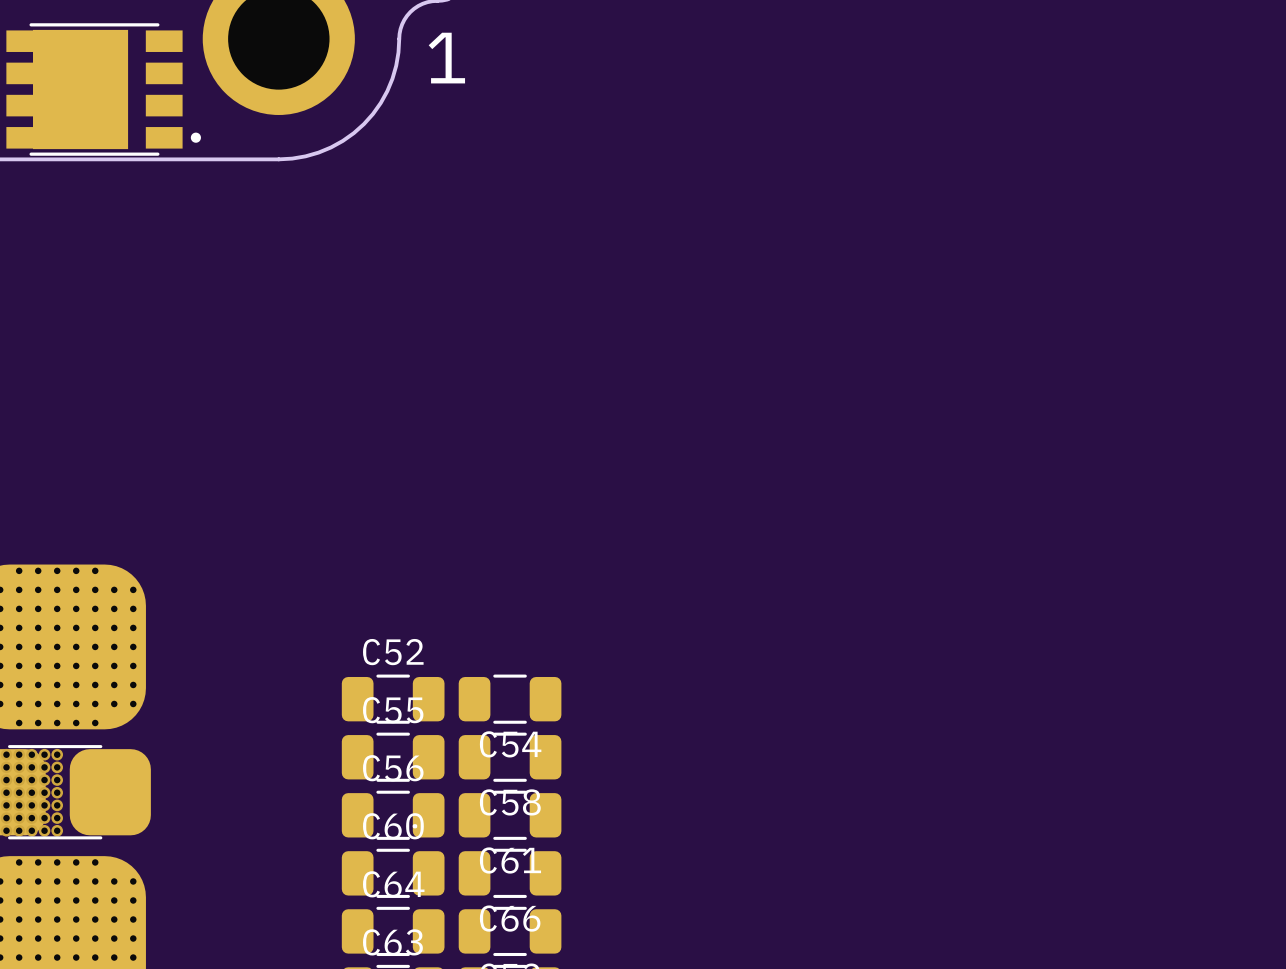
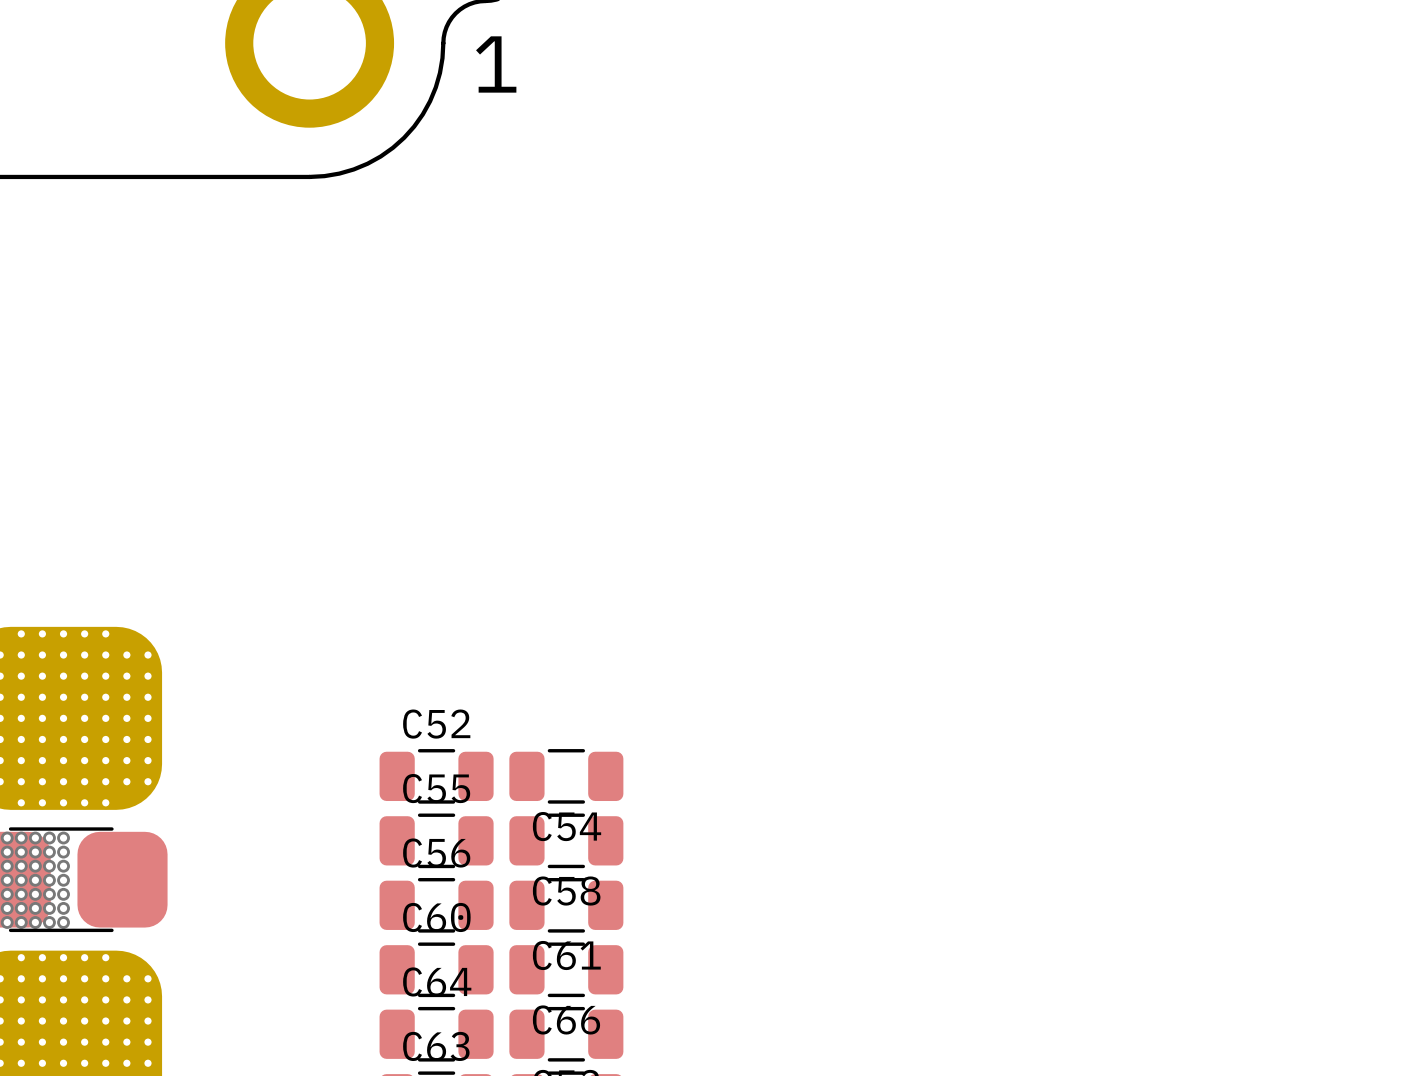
part: (103, 89) -> none

